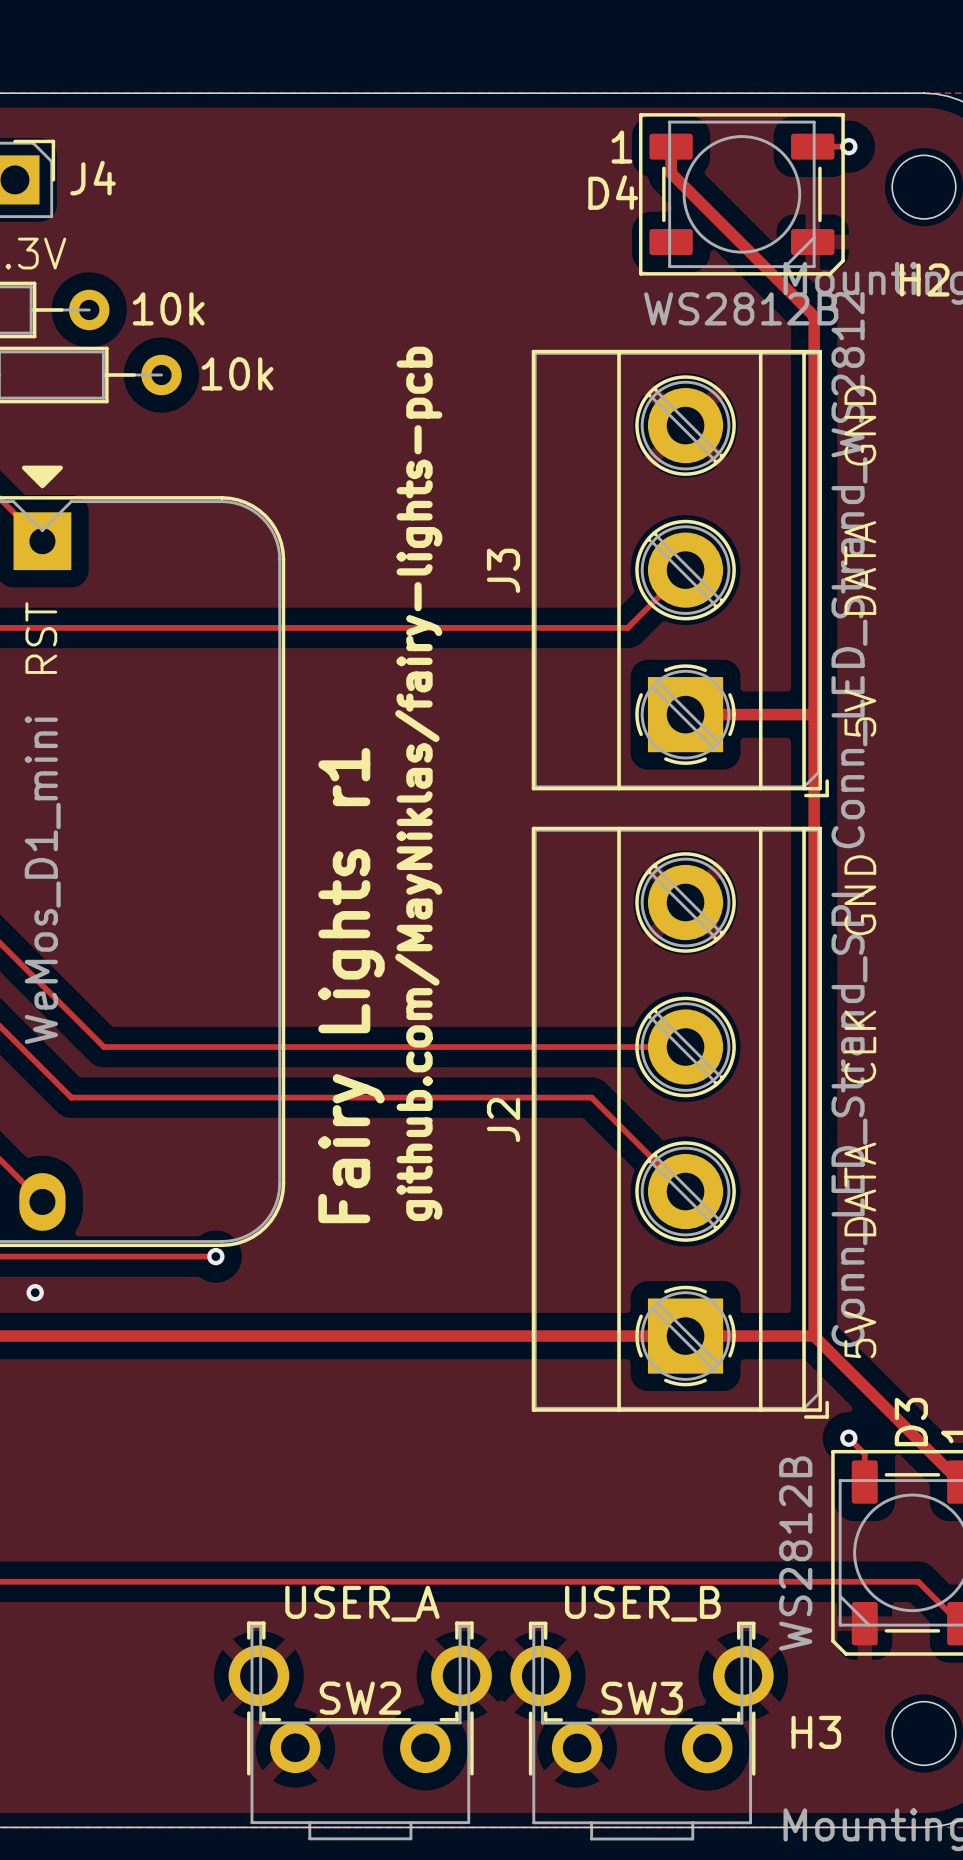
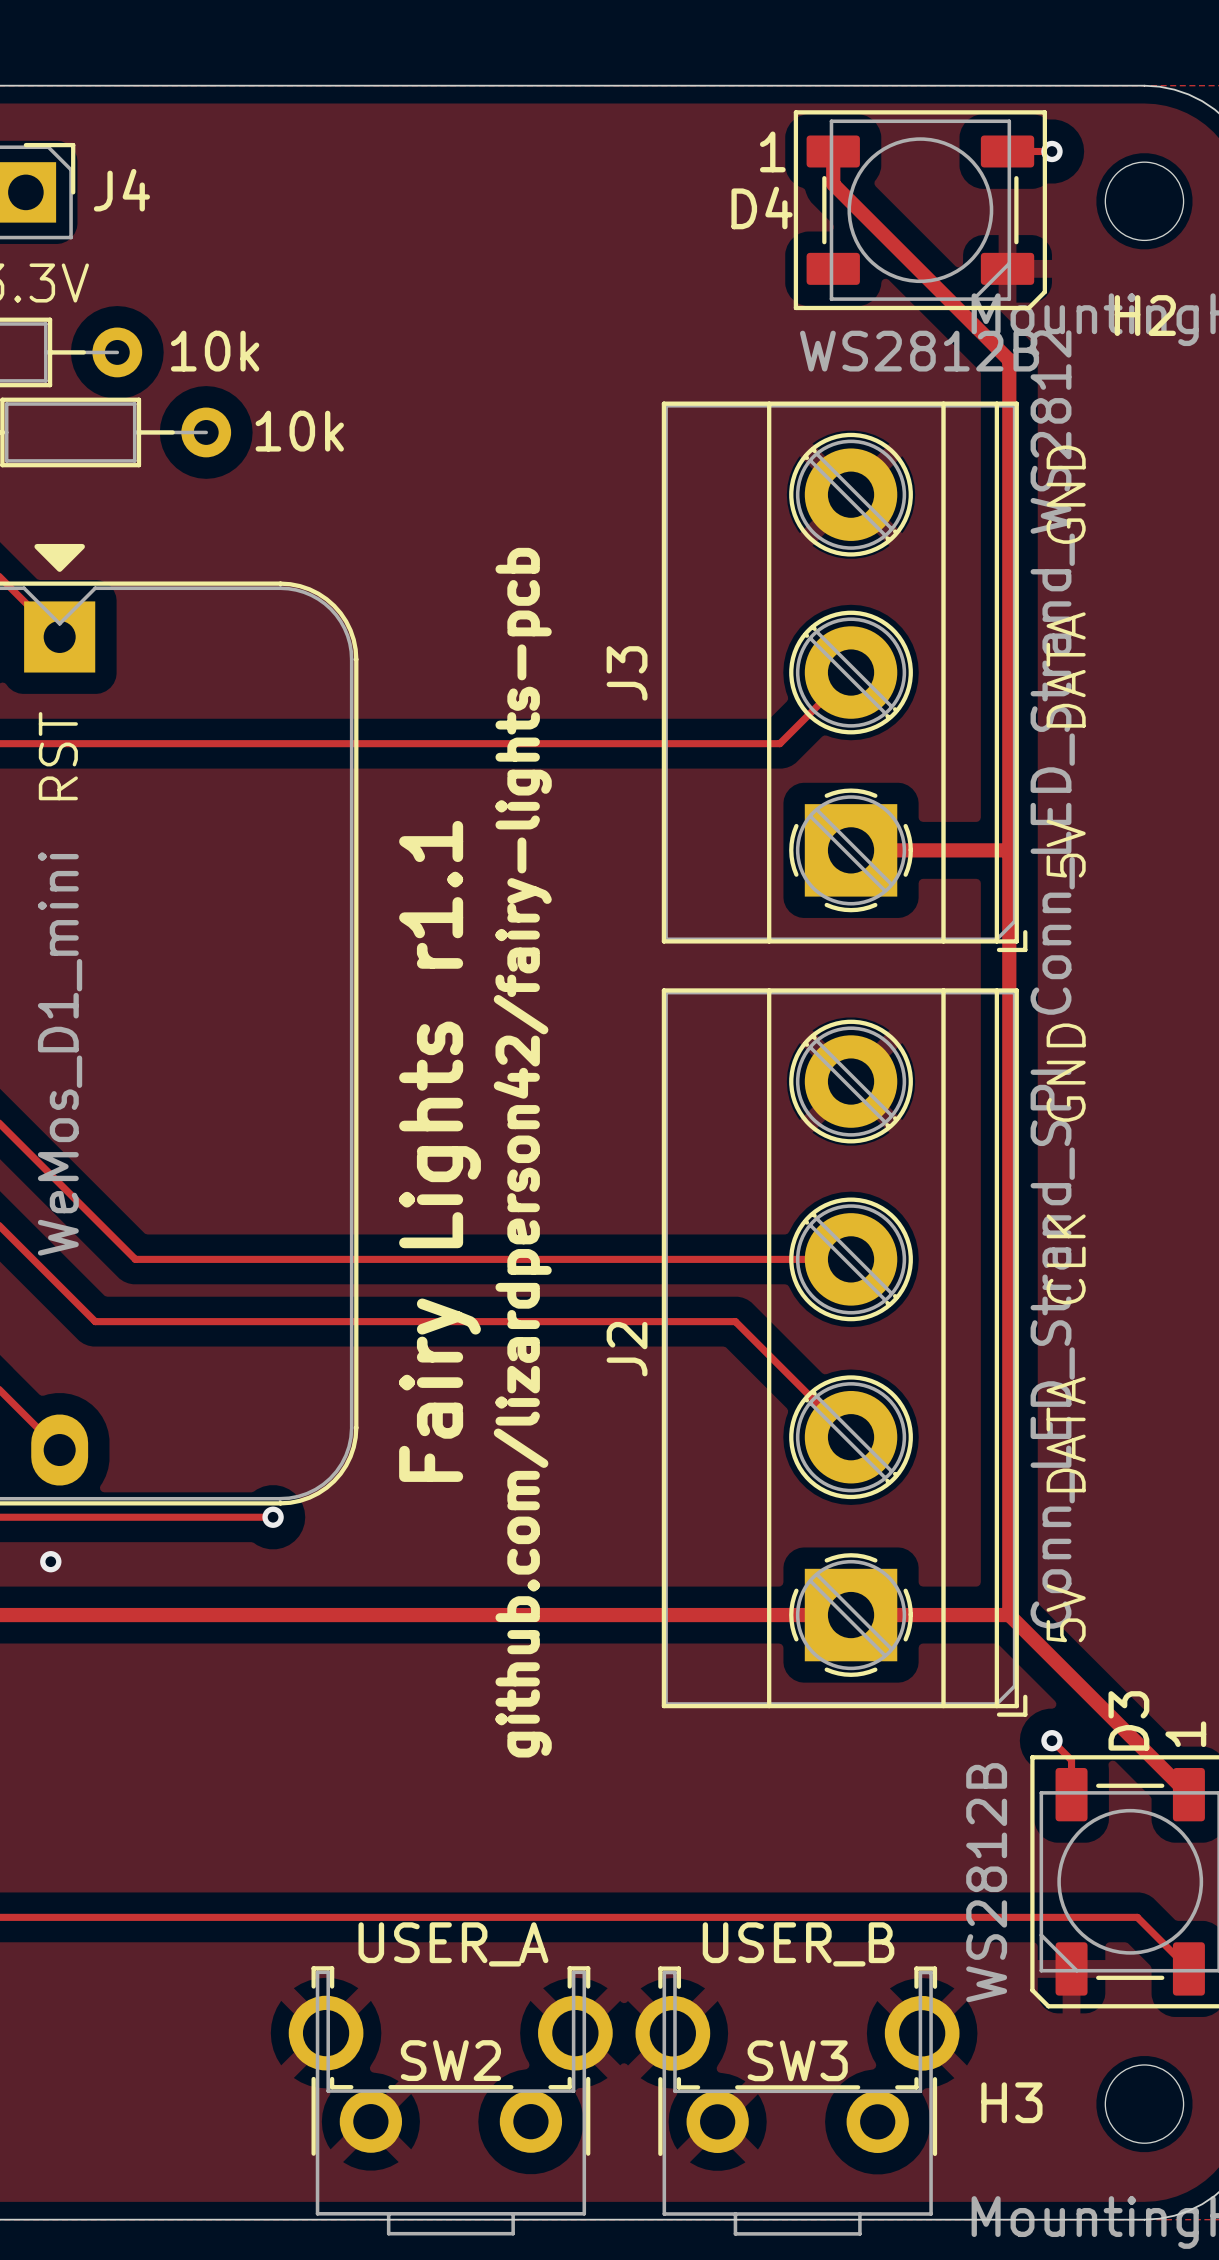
text: github.com/MayNiklas/fairy-lights-pcb (418, 783) -> github.com/lizardperson42/fairy-lights-pcb (522, 1152)
text: Fairy Lights r1 (351, 985) -> Fairy Lights r1.1 (440, 1151)

